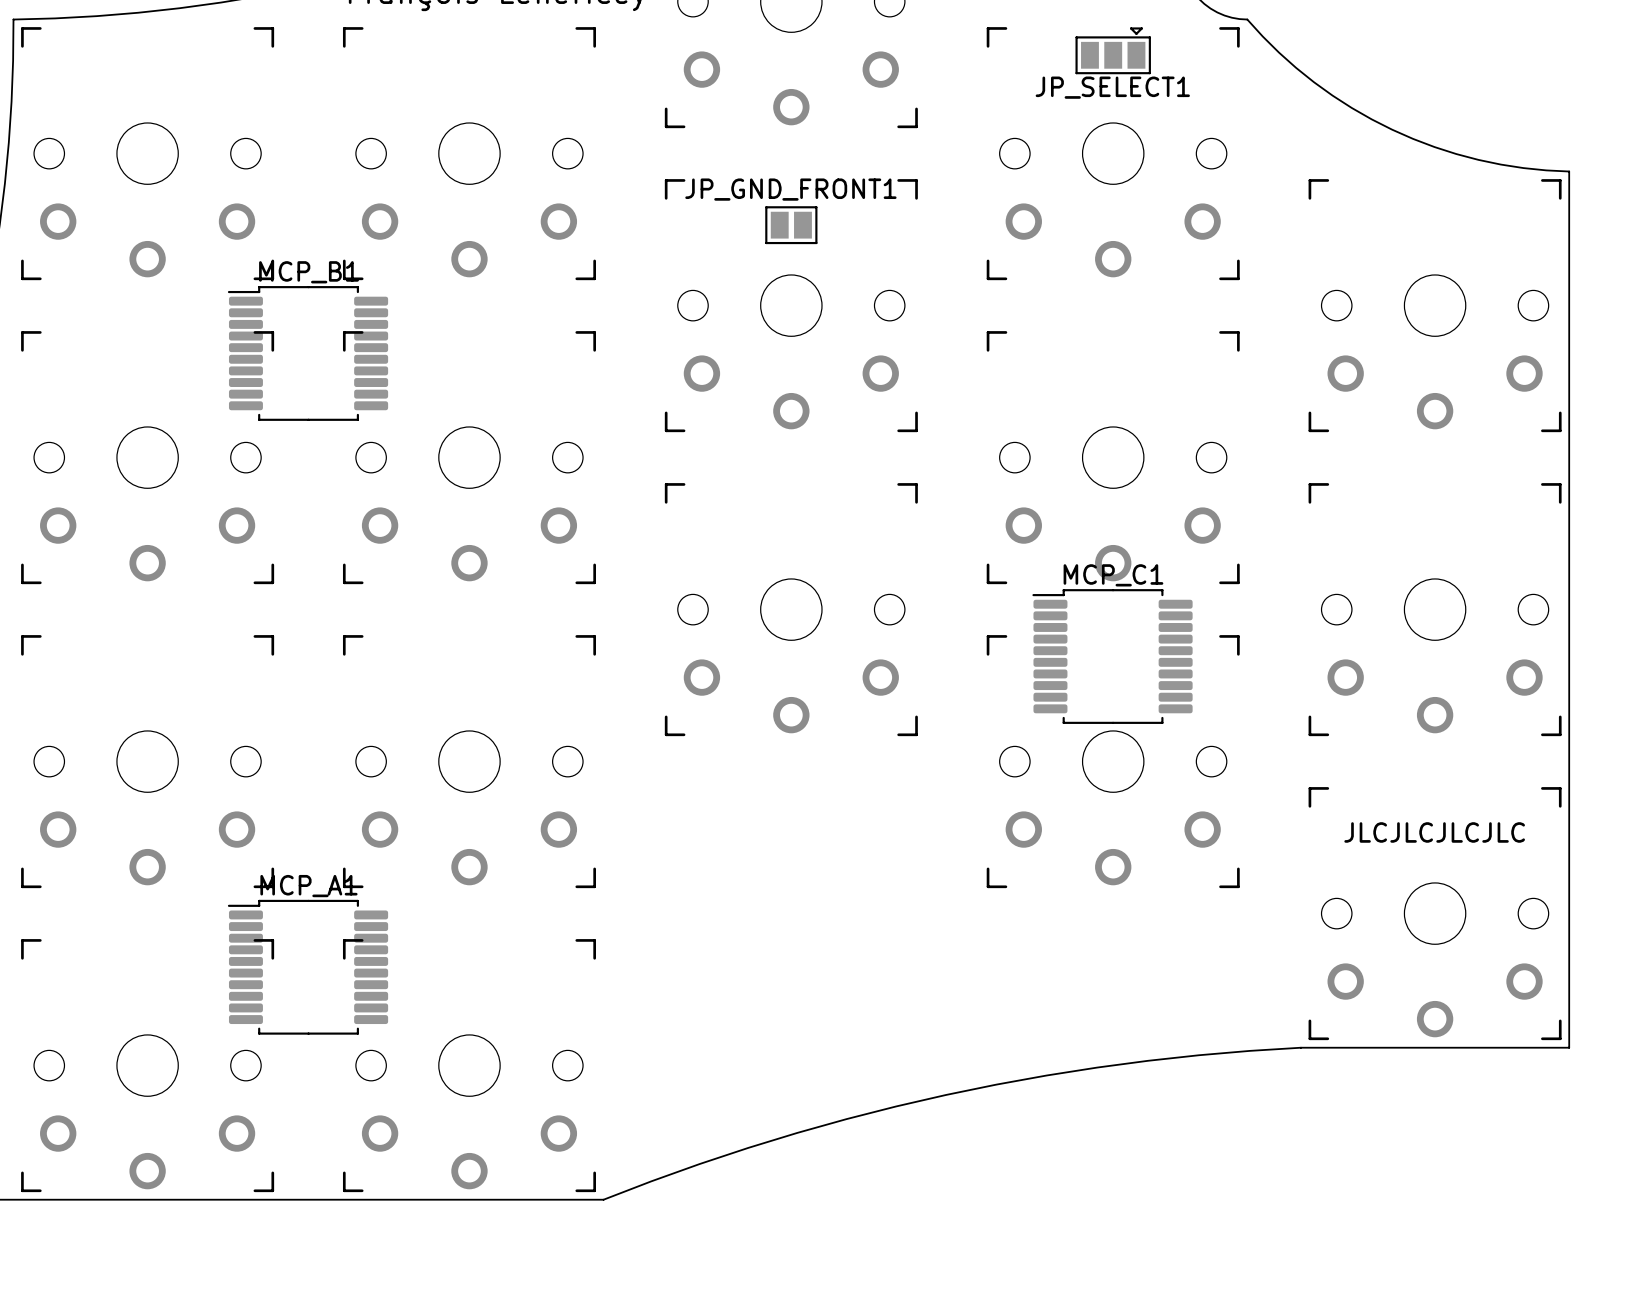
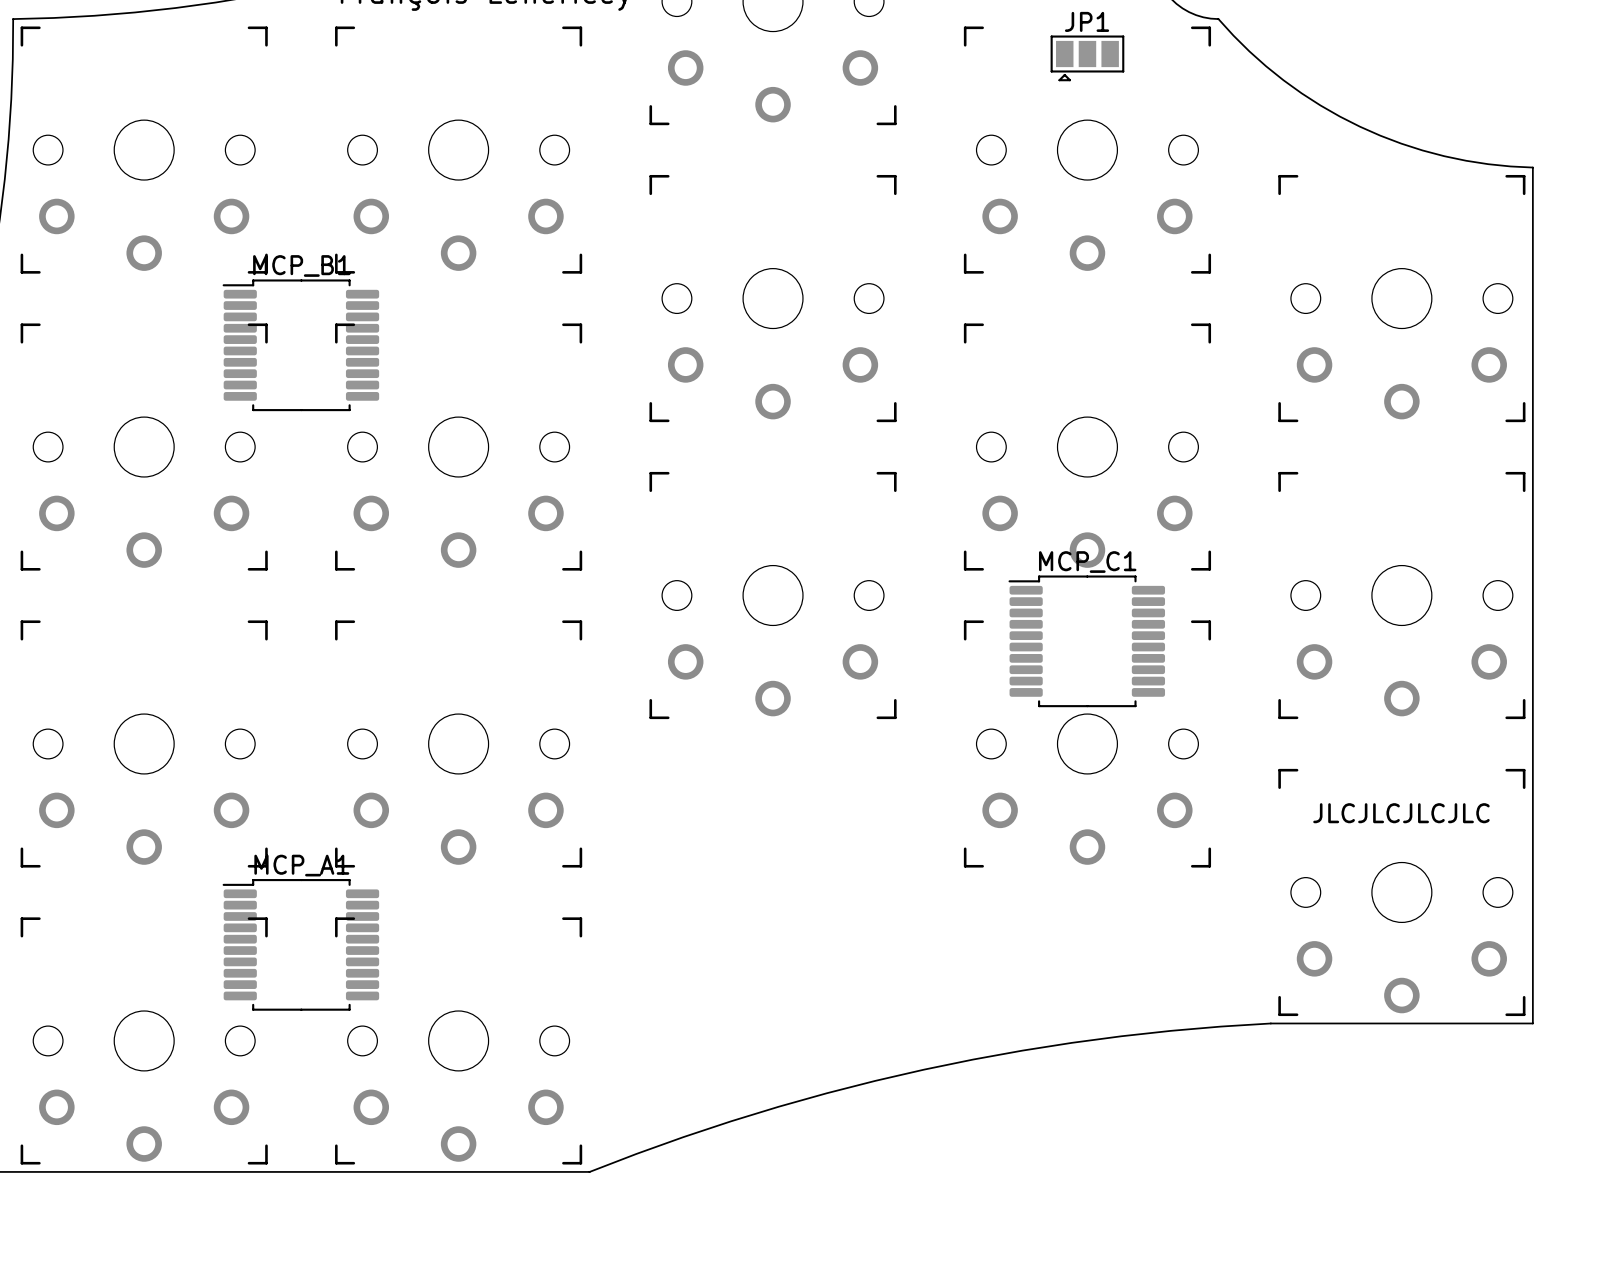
JP_SELECT1: (1113, 50) -> none
JP1: none -> (1087, 58)
JP_GND_FRONT1: (791, 225) -> none

